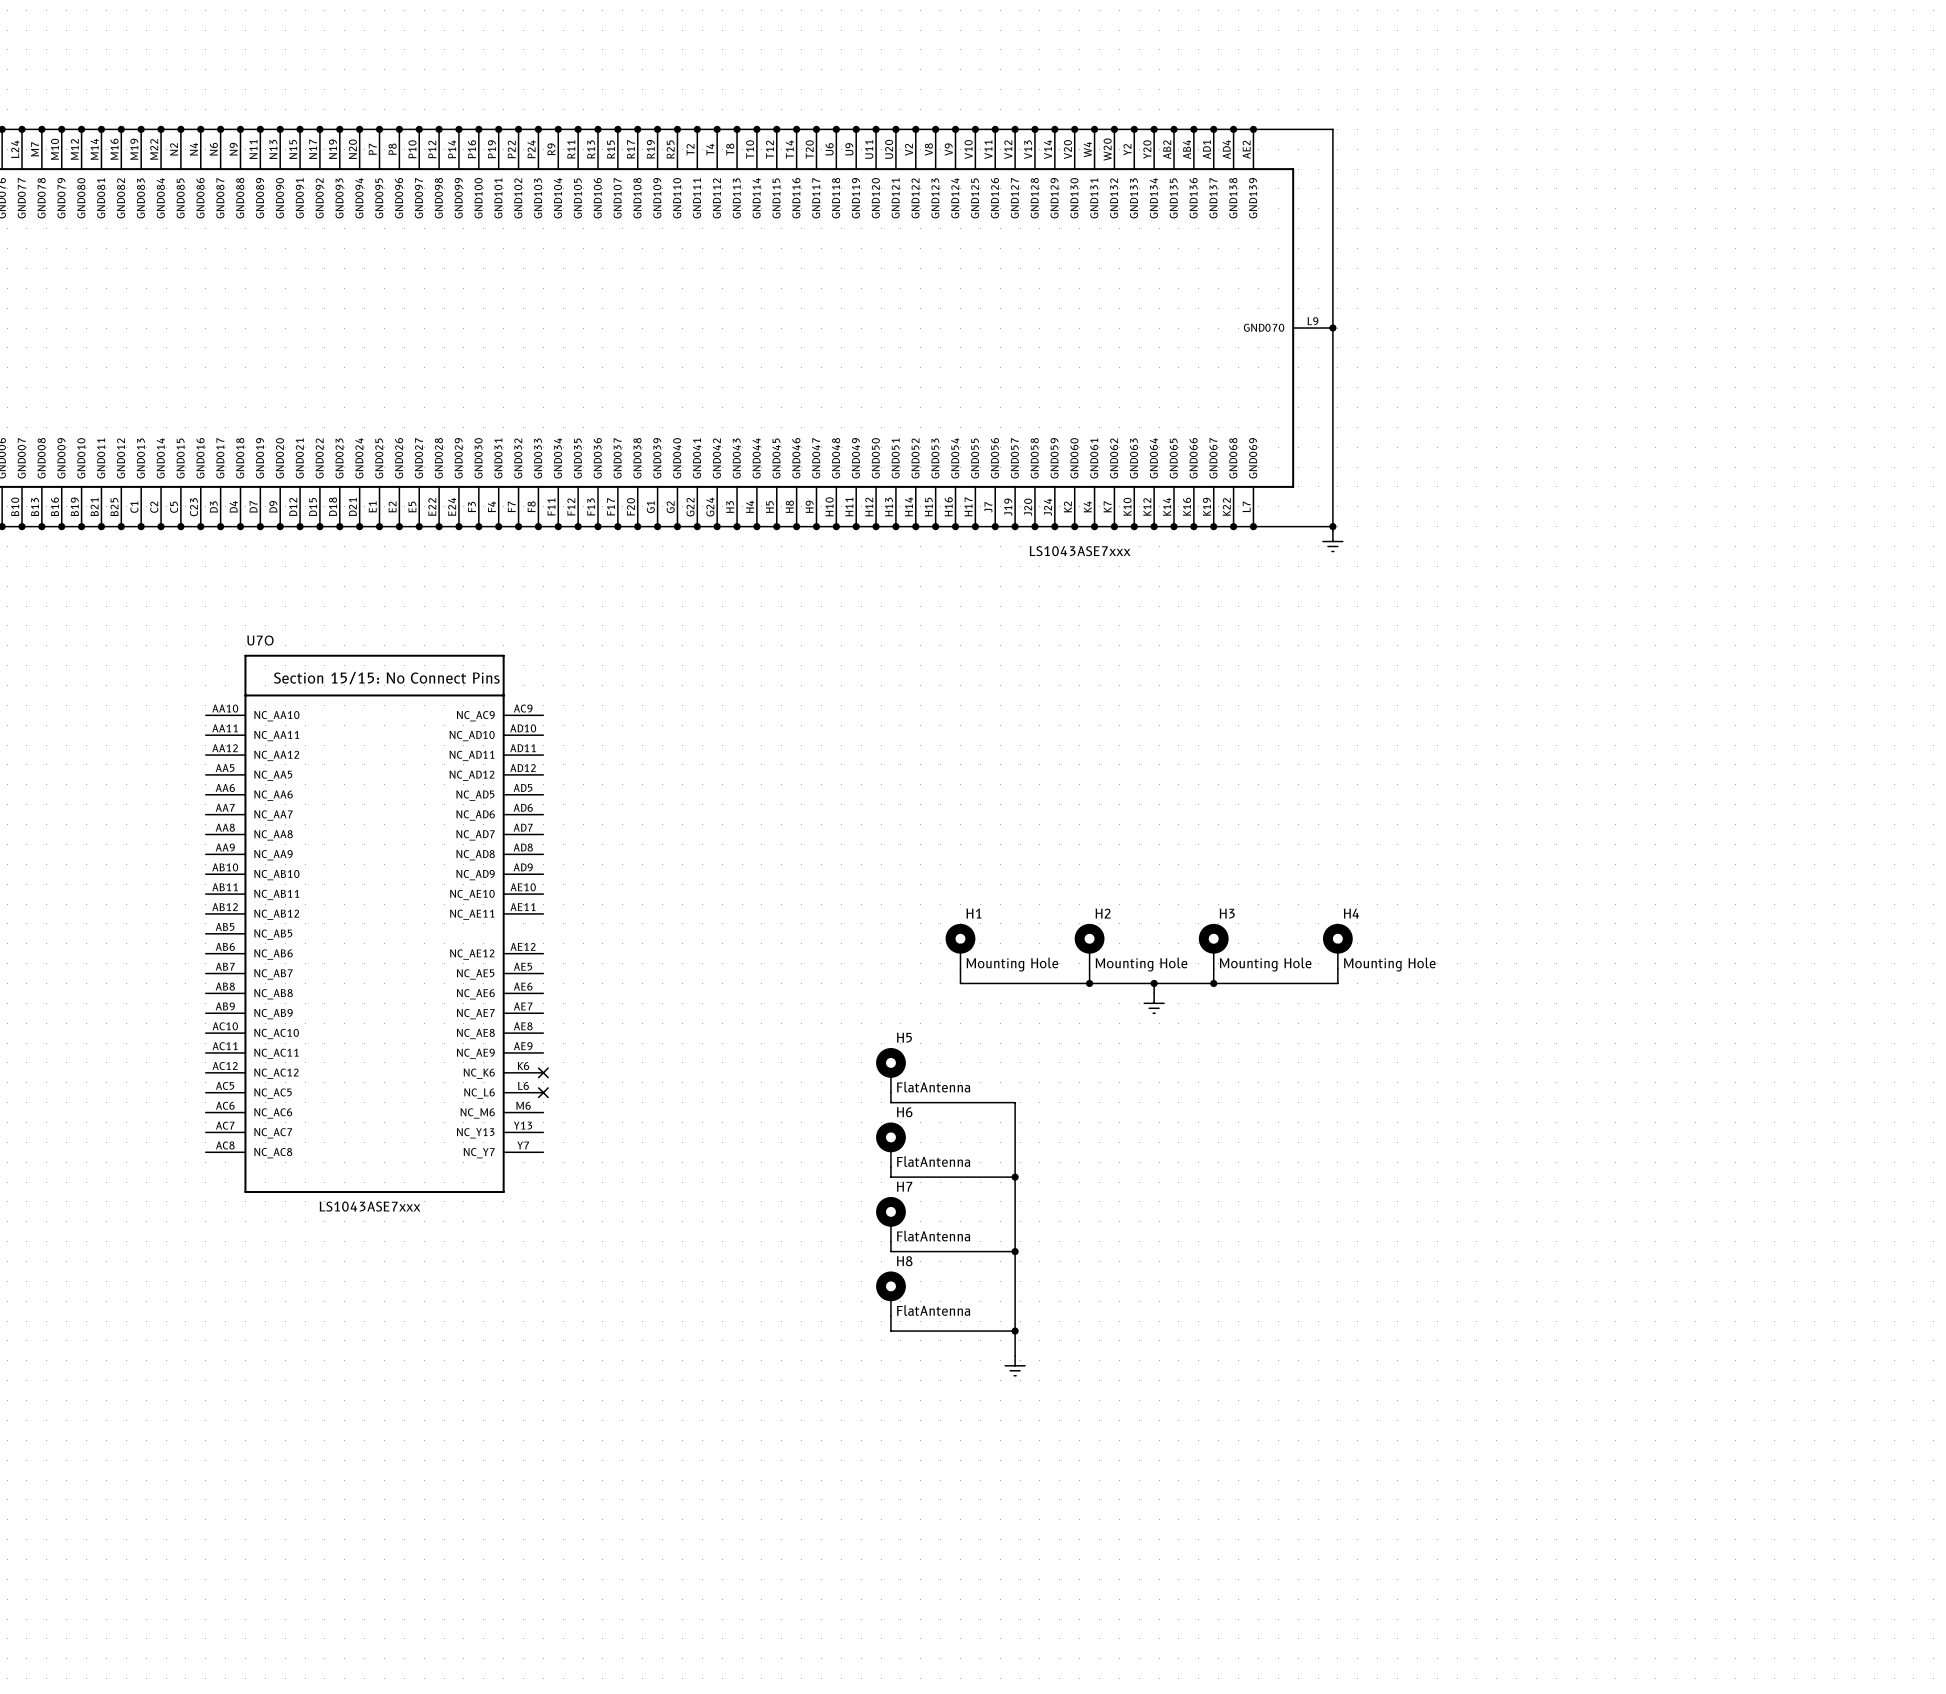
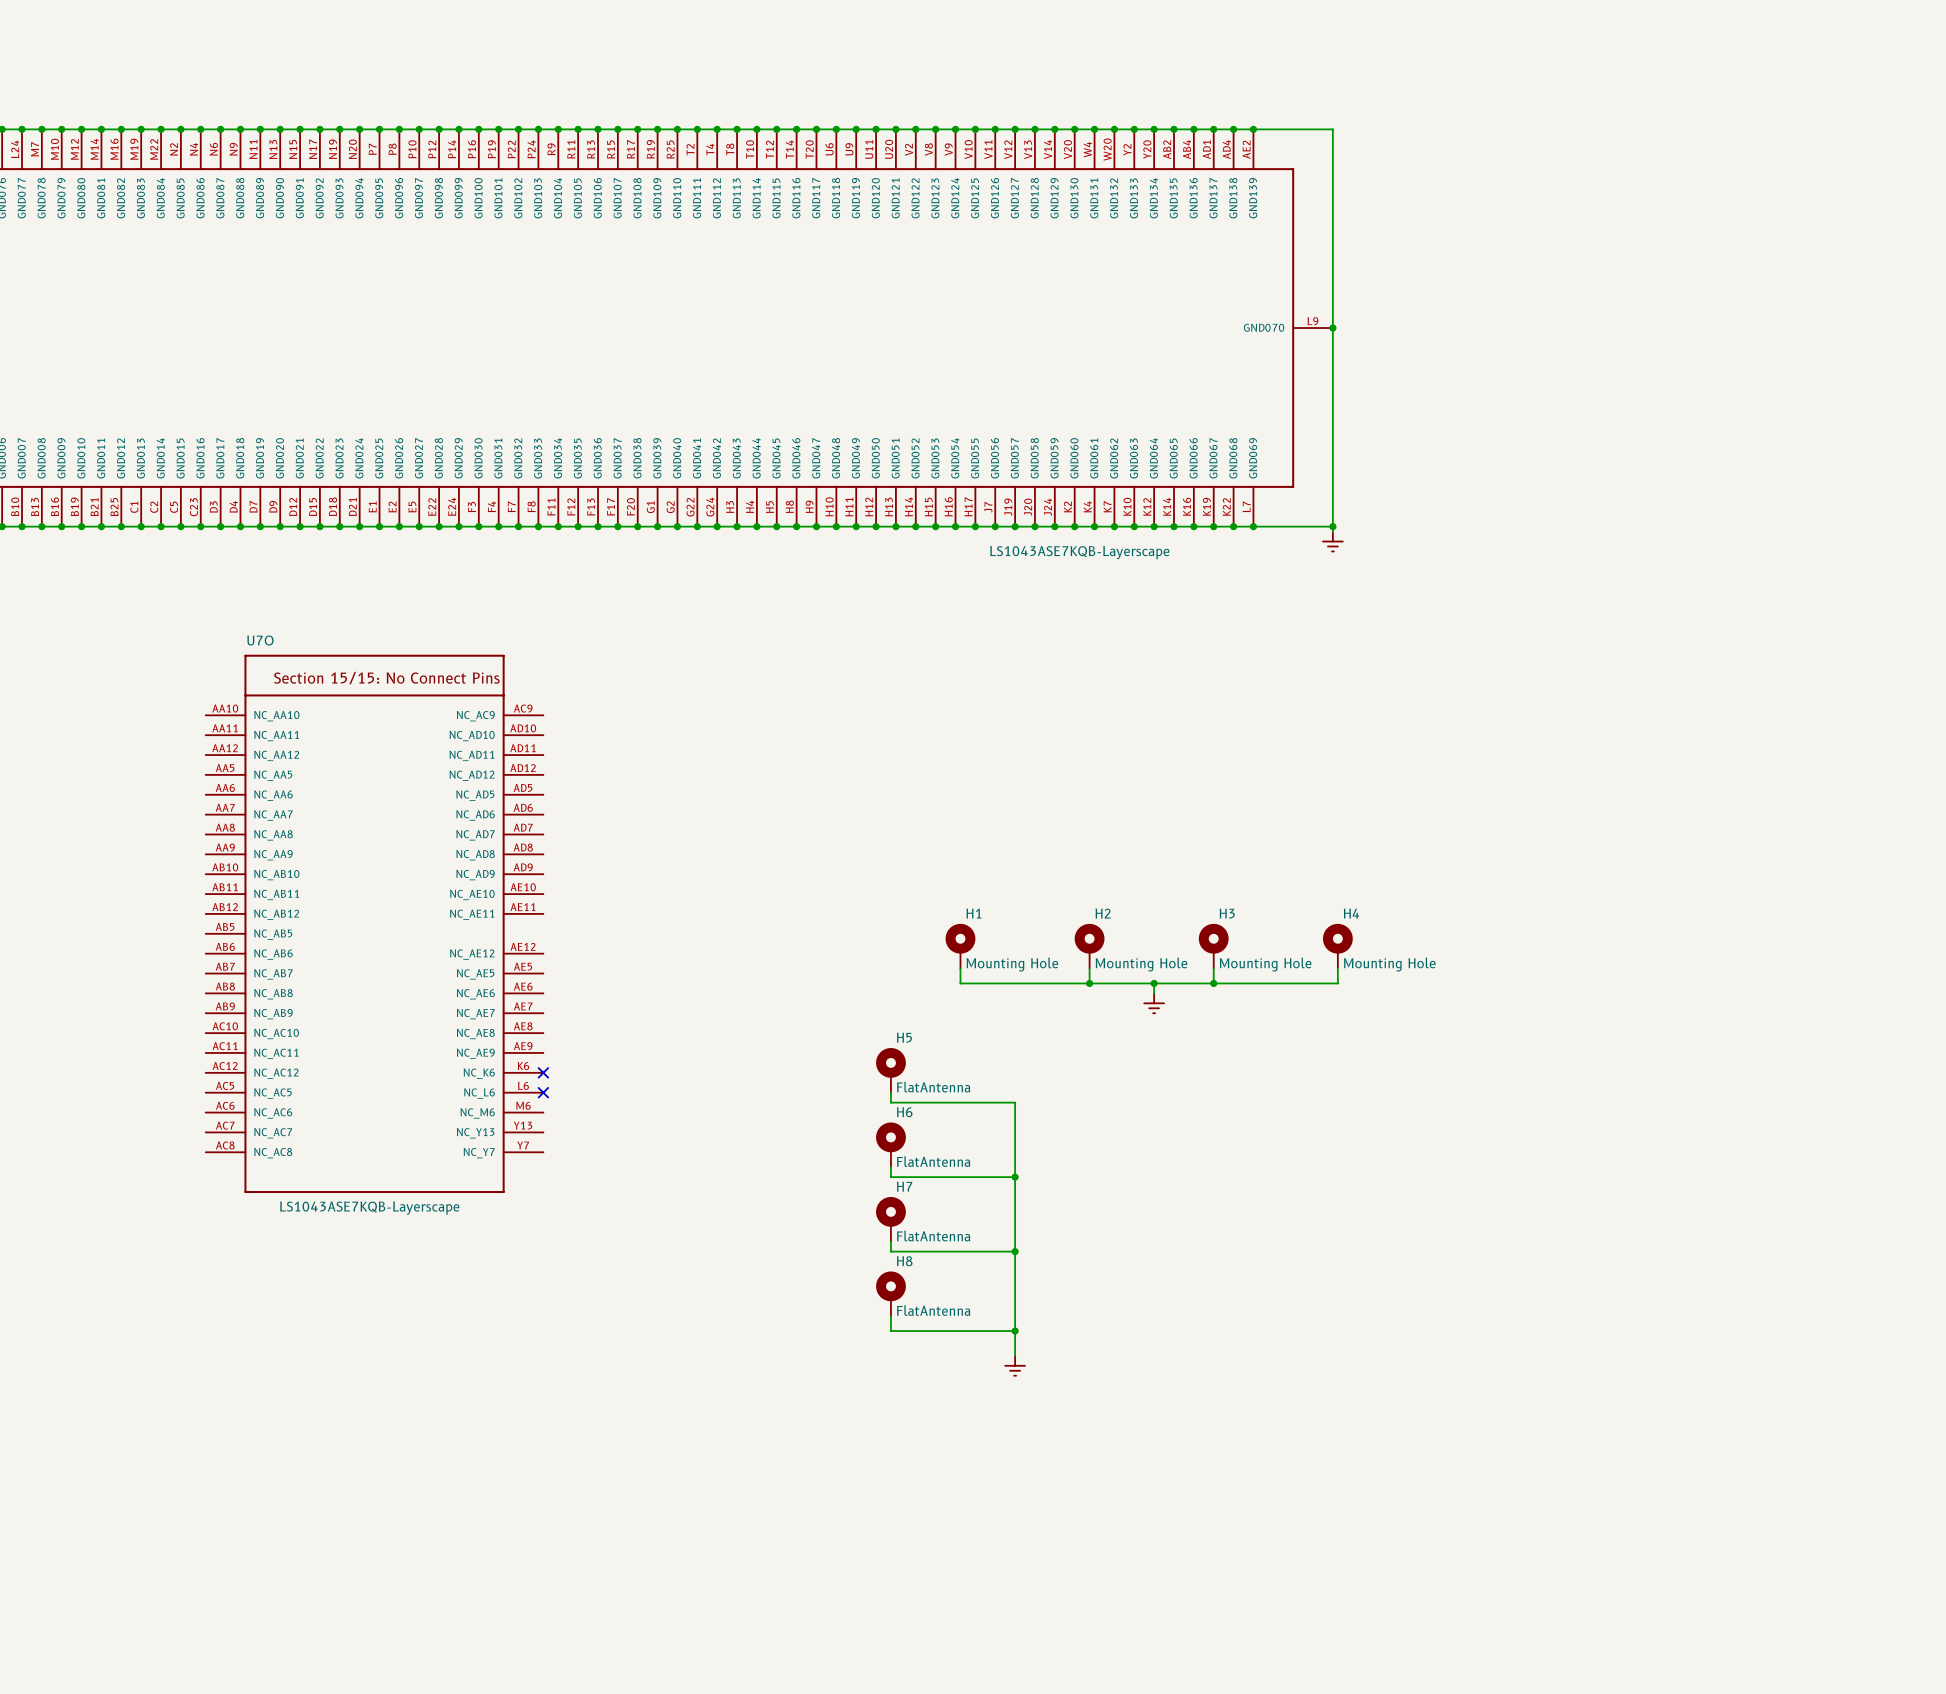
part value: LS1043ASE7xxx (1080, 551) -> LS1043ASE7KQB-Layerscape (1079, 552)
U7O value: LS1043ASE7xxx (370, 1206) -> LS1043ASE7KQB-Layerscape (369, 1208)

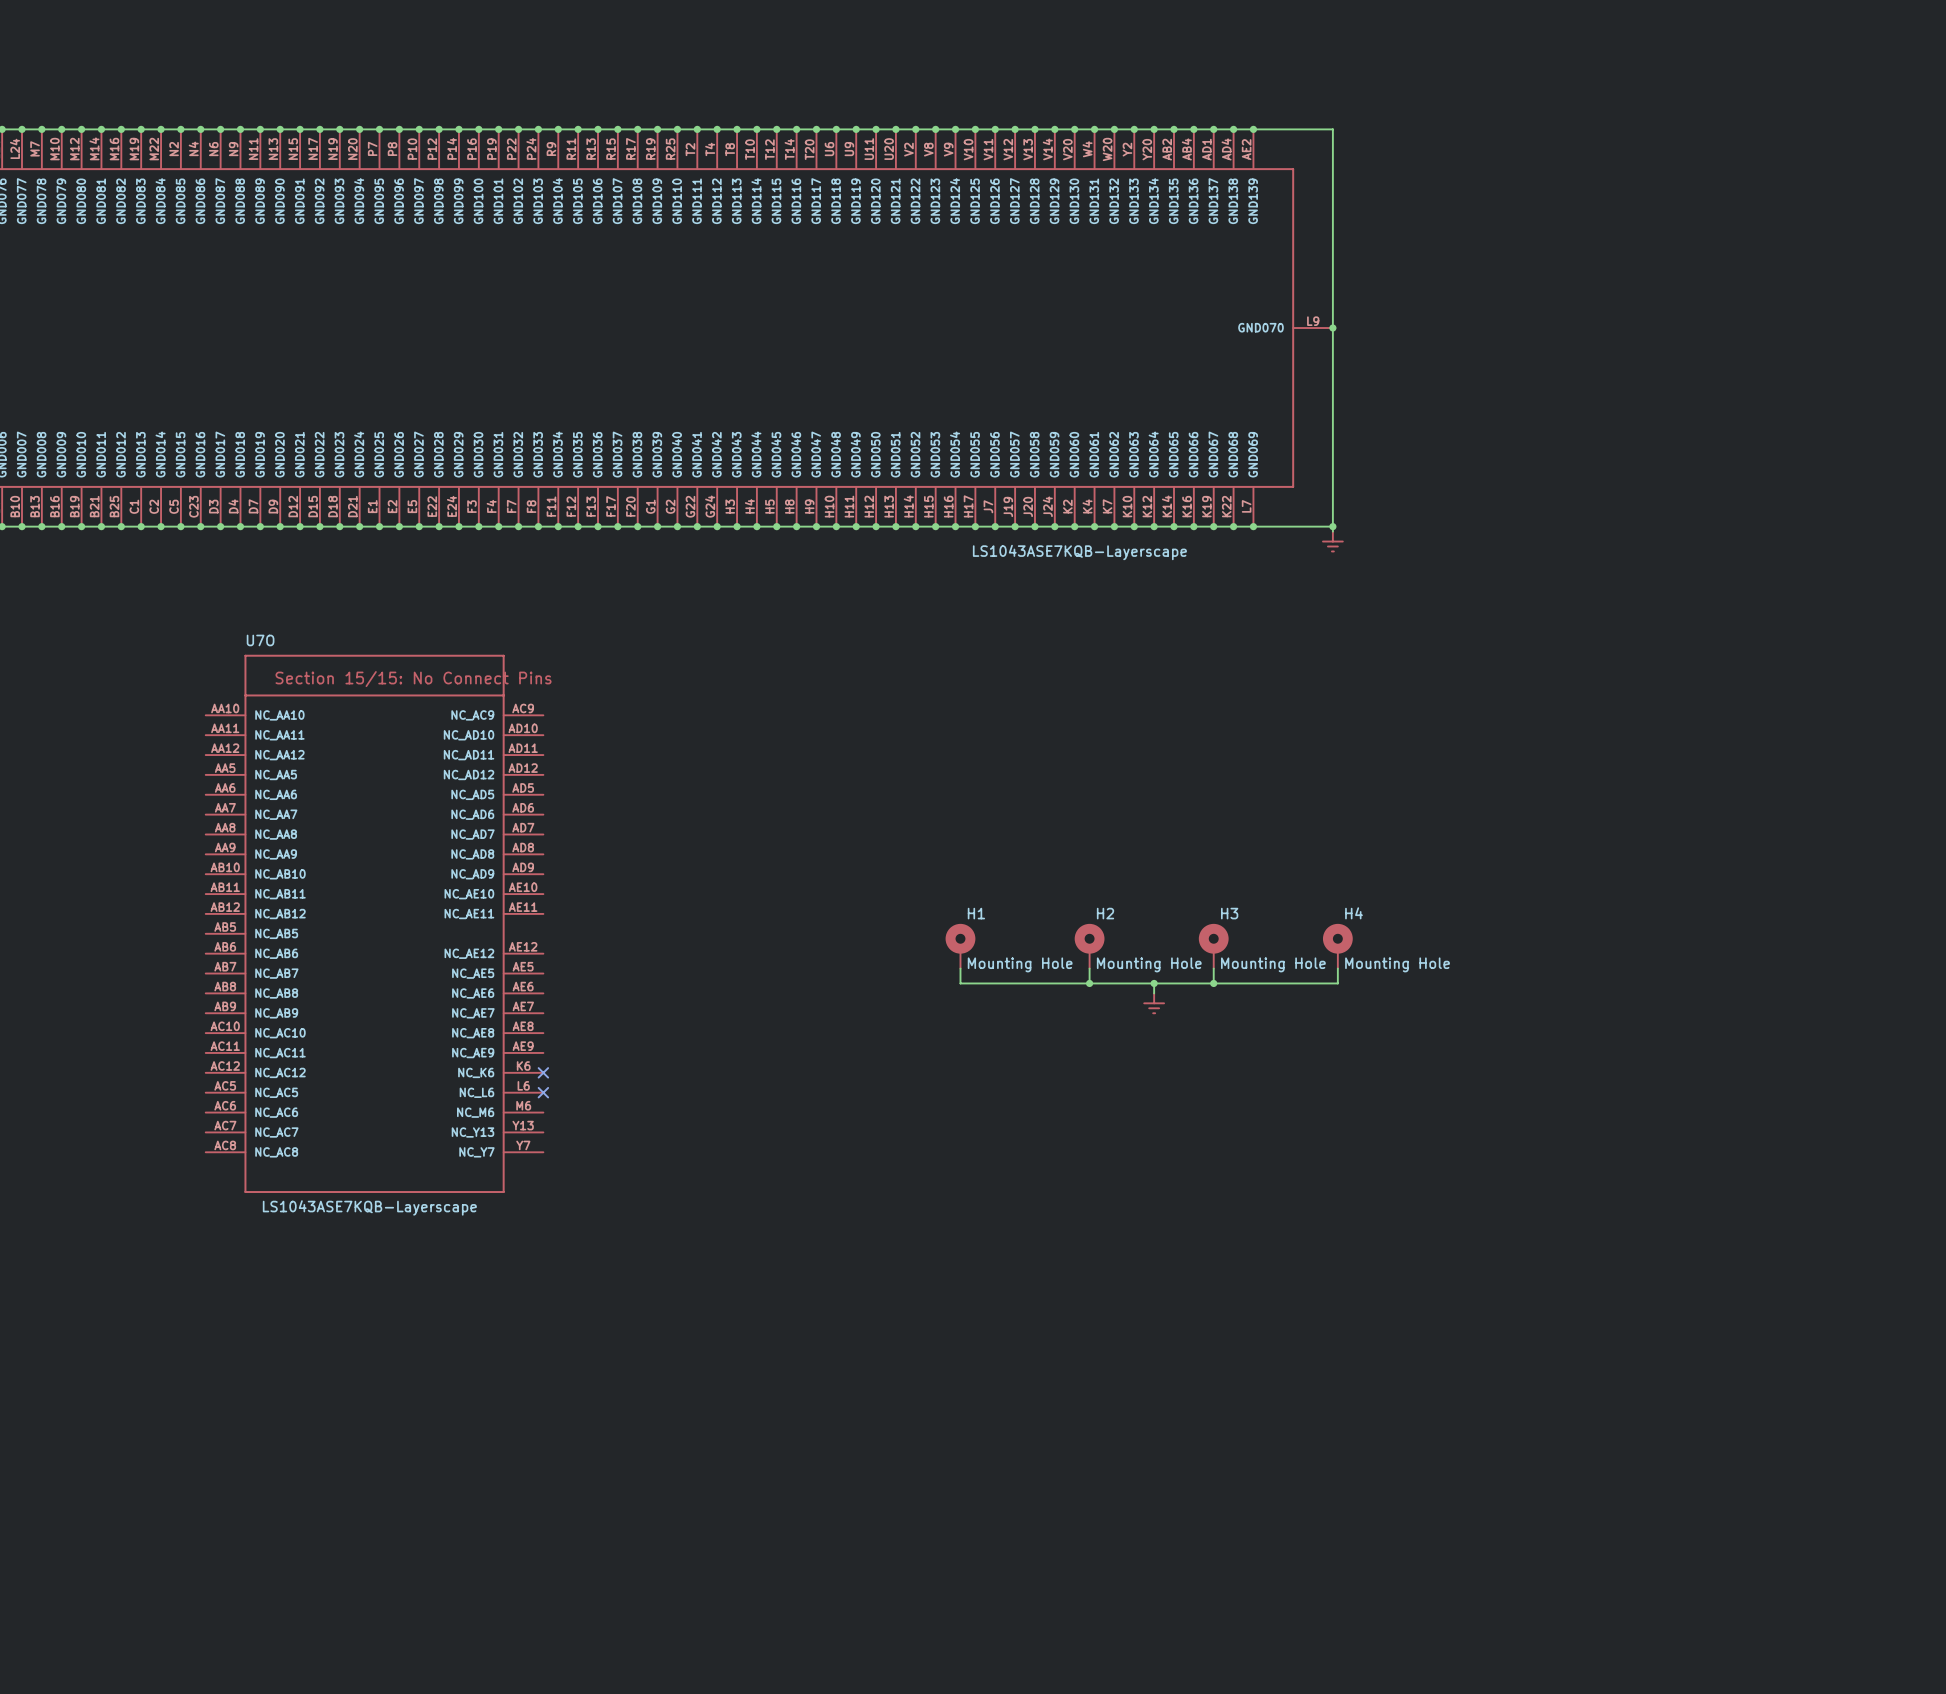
H5: FlatAntenna (890, 1070) -> none
wire: (890, 1092) (890, 1102) (1015, 1102) (1015, 1355) -> none
H6: FlatAntenna (890, 1144) -> none
wire: (890, 1167) (890, 1177) (1015, 1177) -> none
junction: (1015, 1177) -> none
H7: FlatAntenna (890, 1219) -> none
wire: (890, 1241) (890, 1251) (1015, 1251) -> none
junction: (1015, 1251) -> none
H8: FlatAntenna (890, 1293) -> none
wire: (890, 1316) (890, 1331) (1015, 1331) -> none
junction: (1015, 1331) -> none
power symbol: (1015, 1365) -> none

